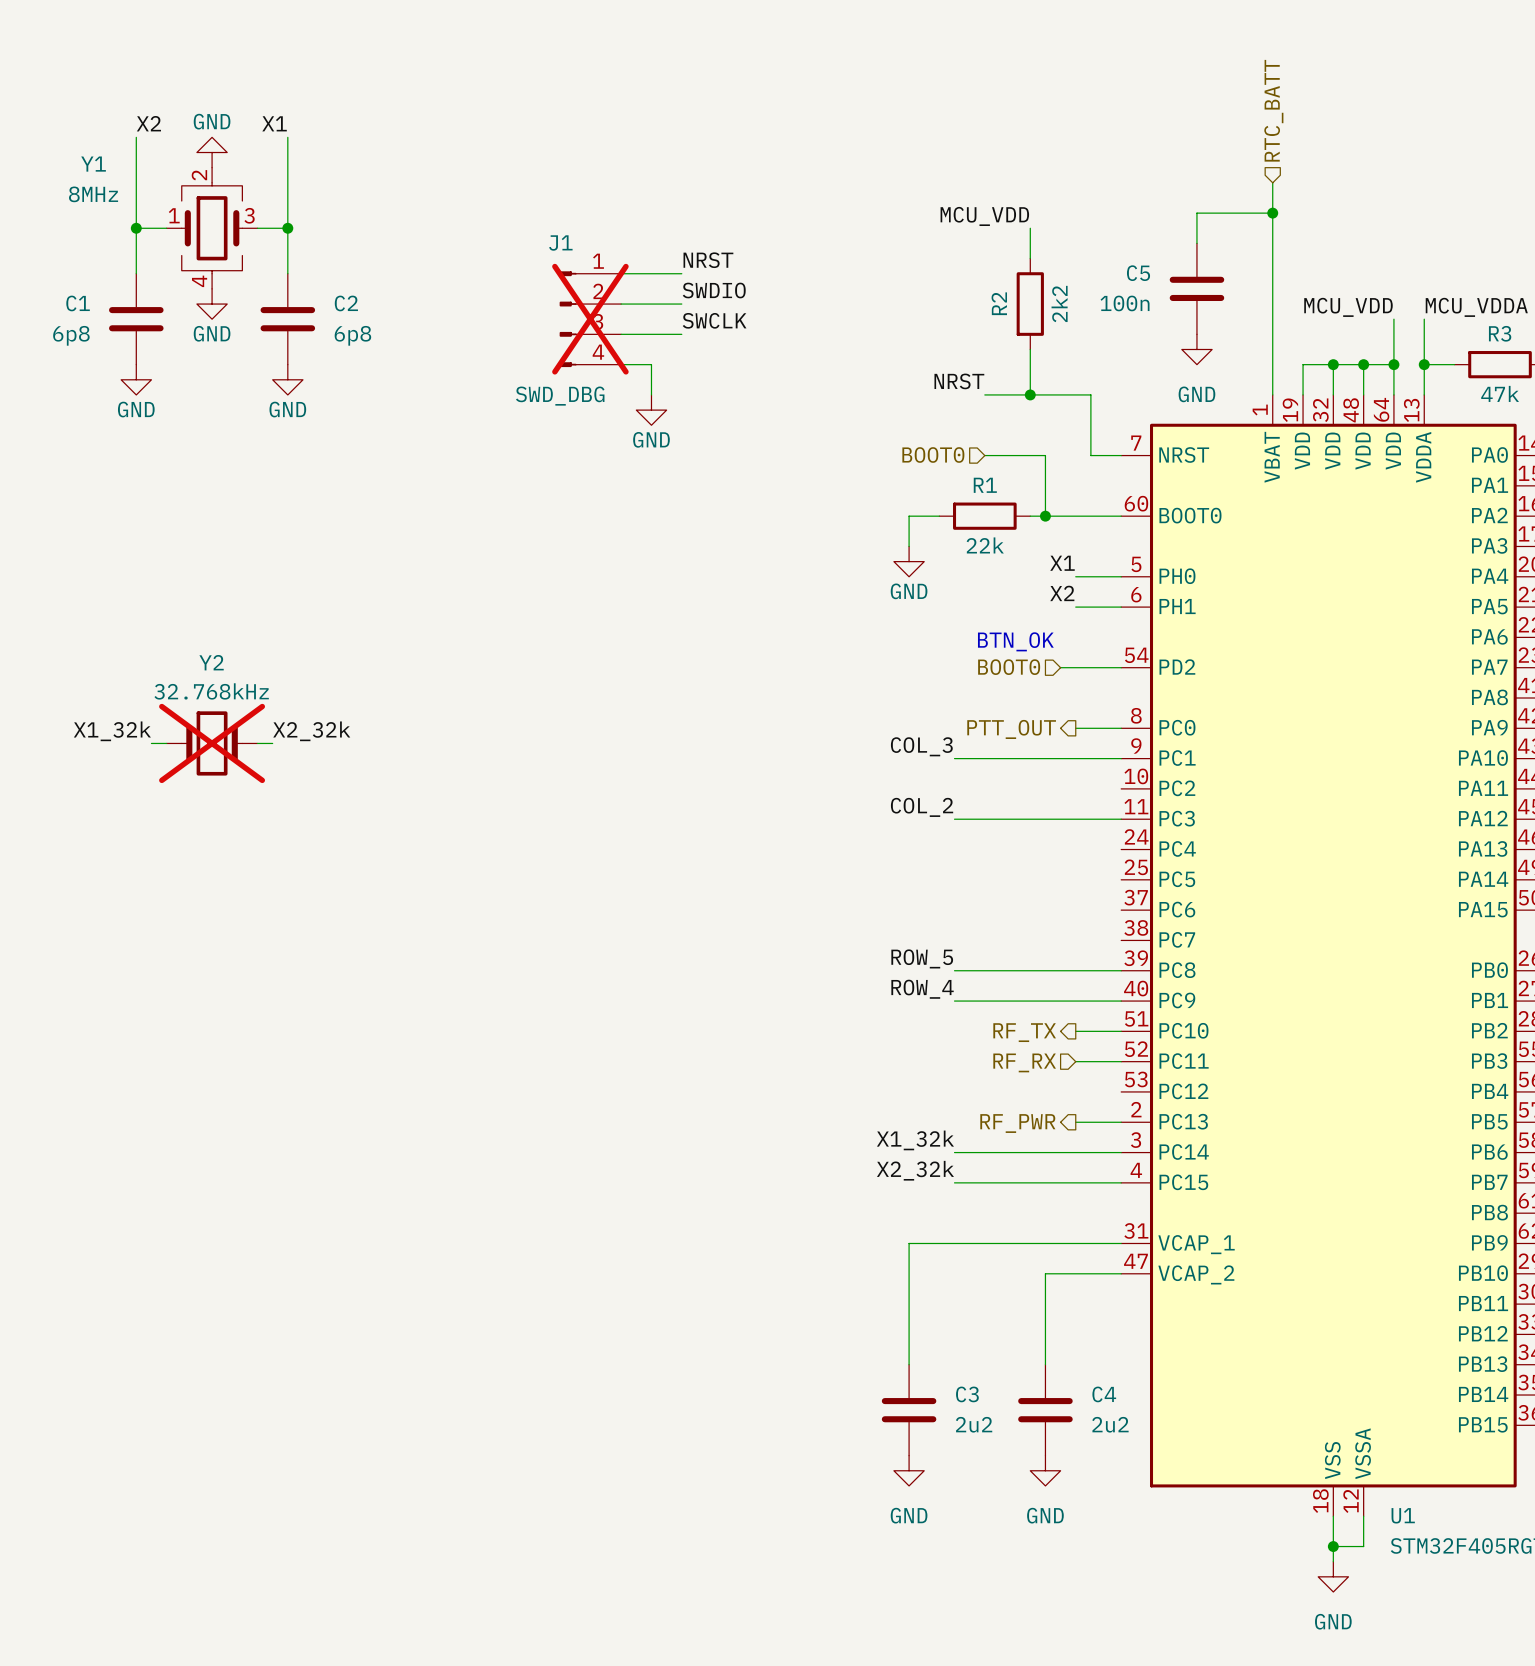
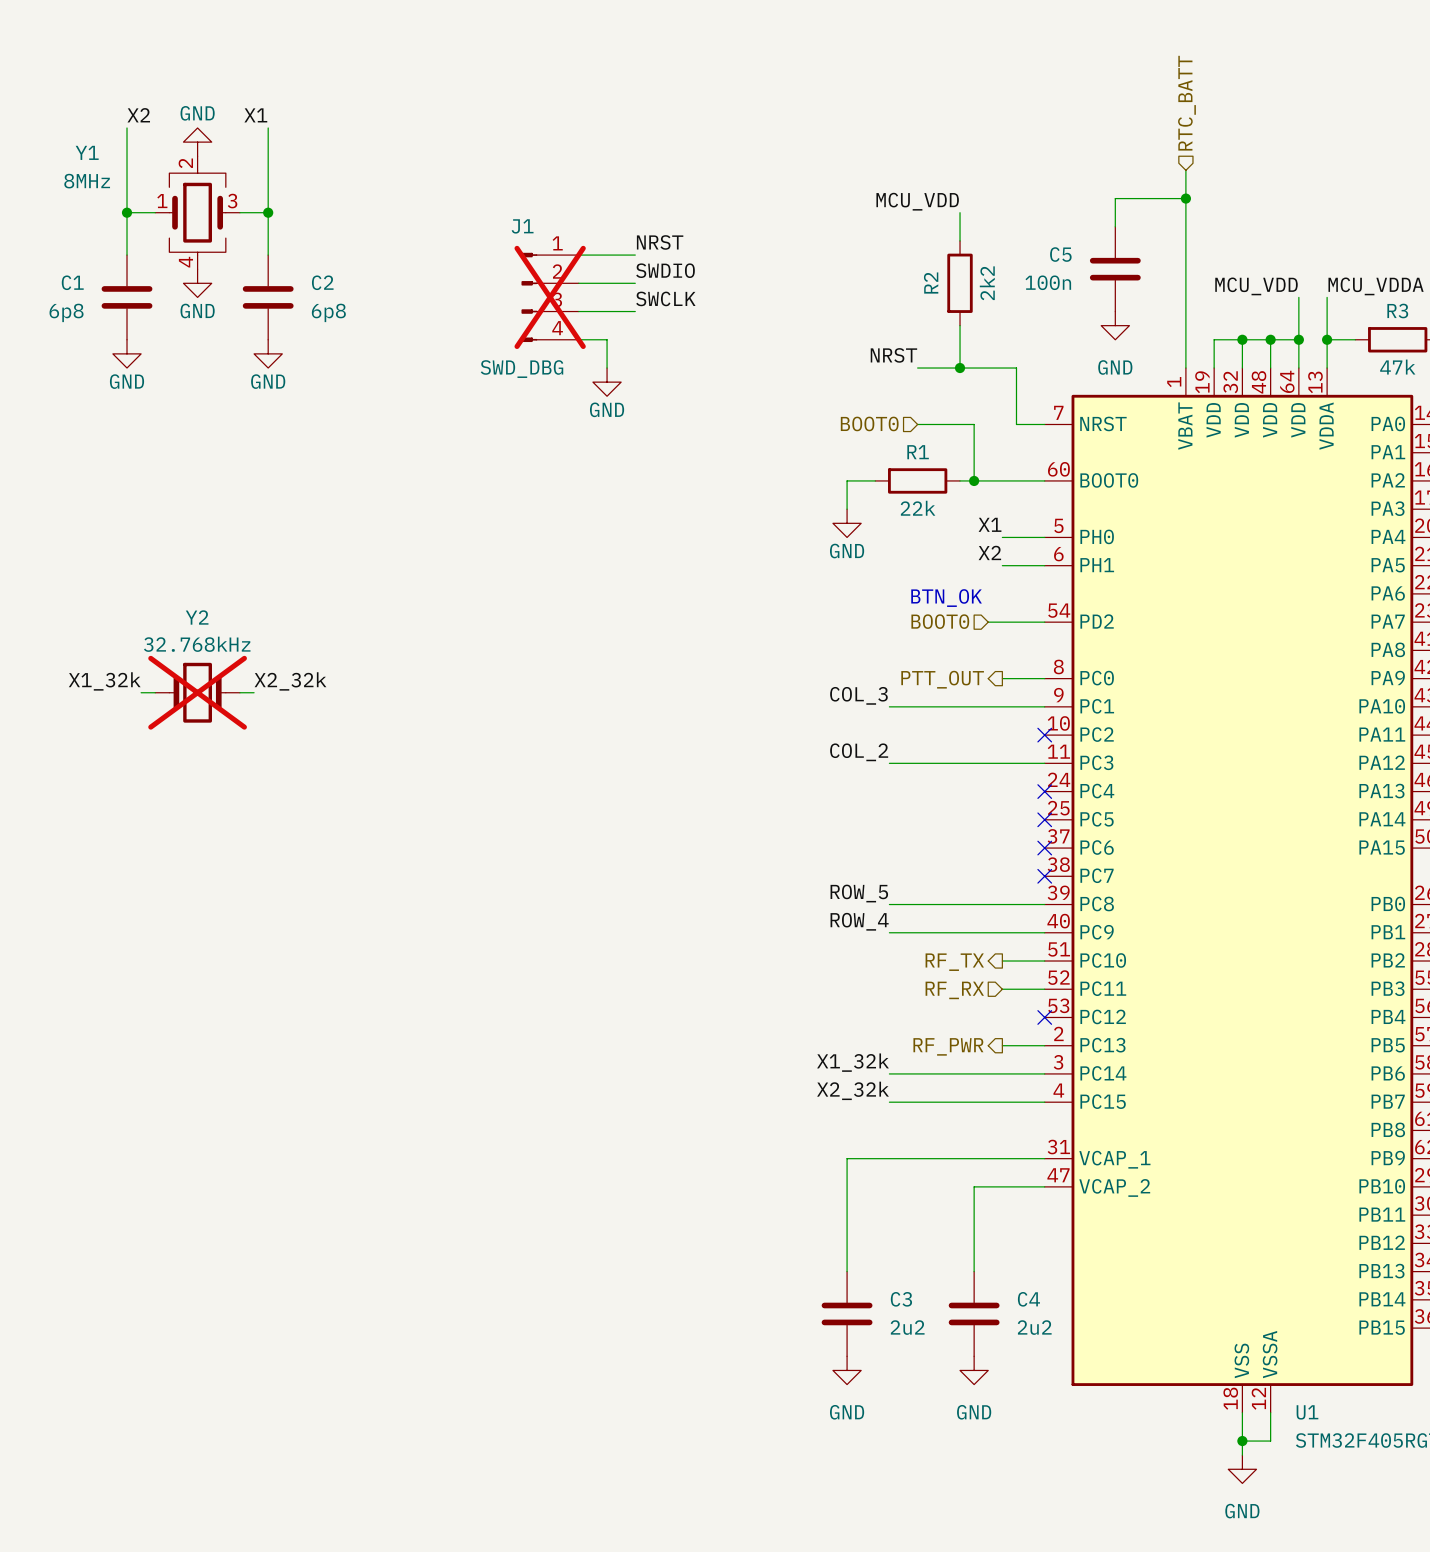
no-connect mark: none -> (1044, 735)
no-connect mark: none -> (1044, 791)
no-connect mark: none -> (1044, 819)
no-connect mark: none -> (1044, 848)
no-connect mark: none -> (1044, 876)
no-connect mark: none -> (1044, 1017)

